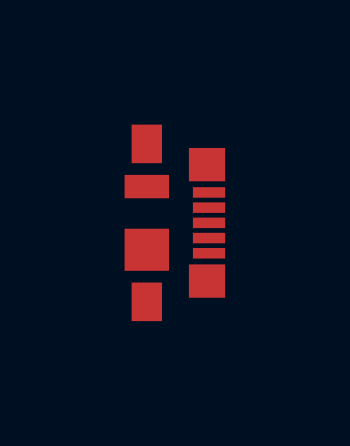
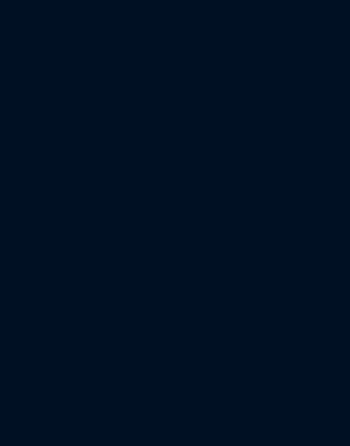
part: (174, 222) -> none

